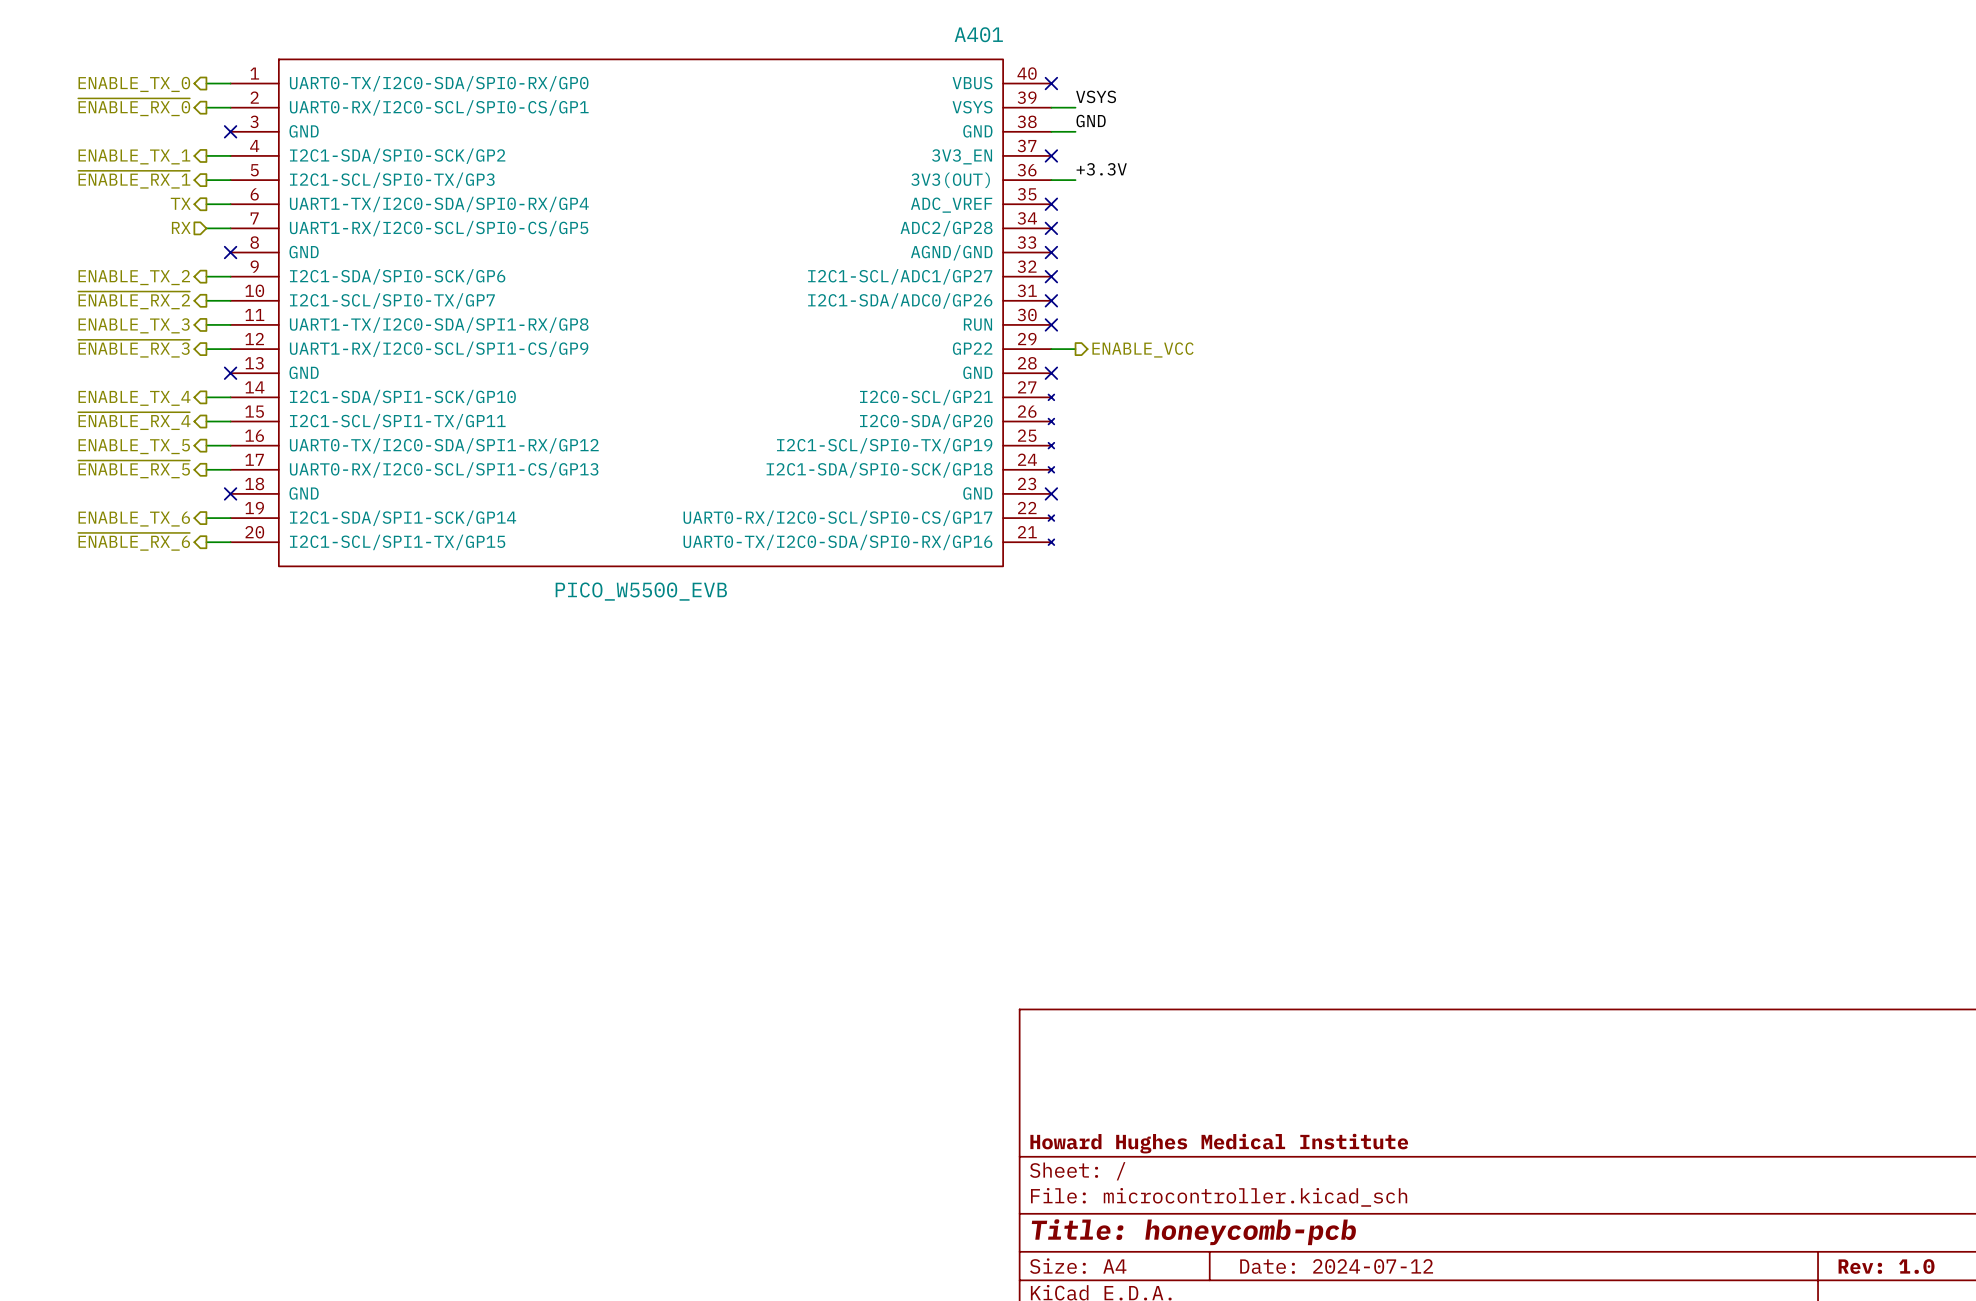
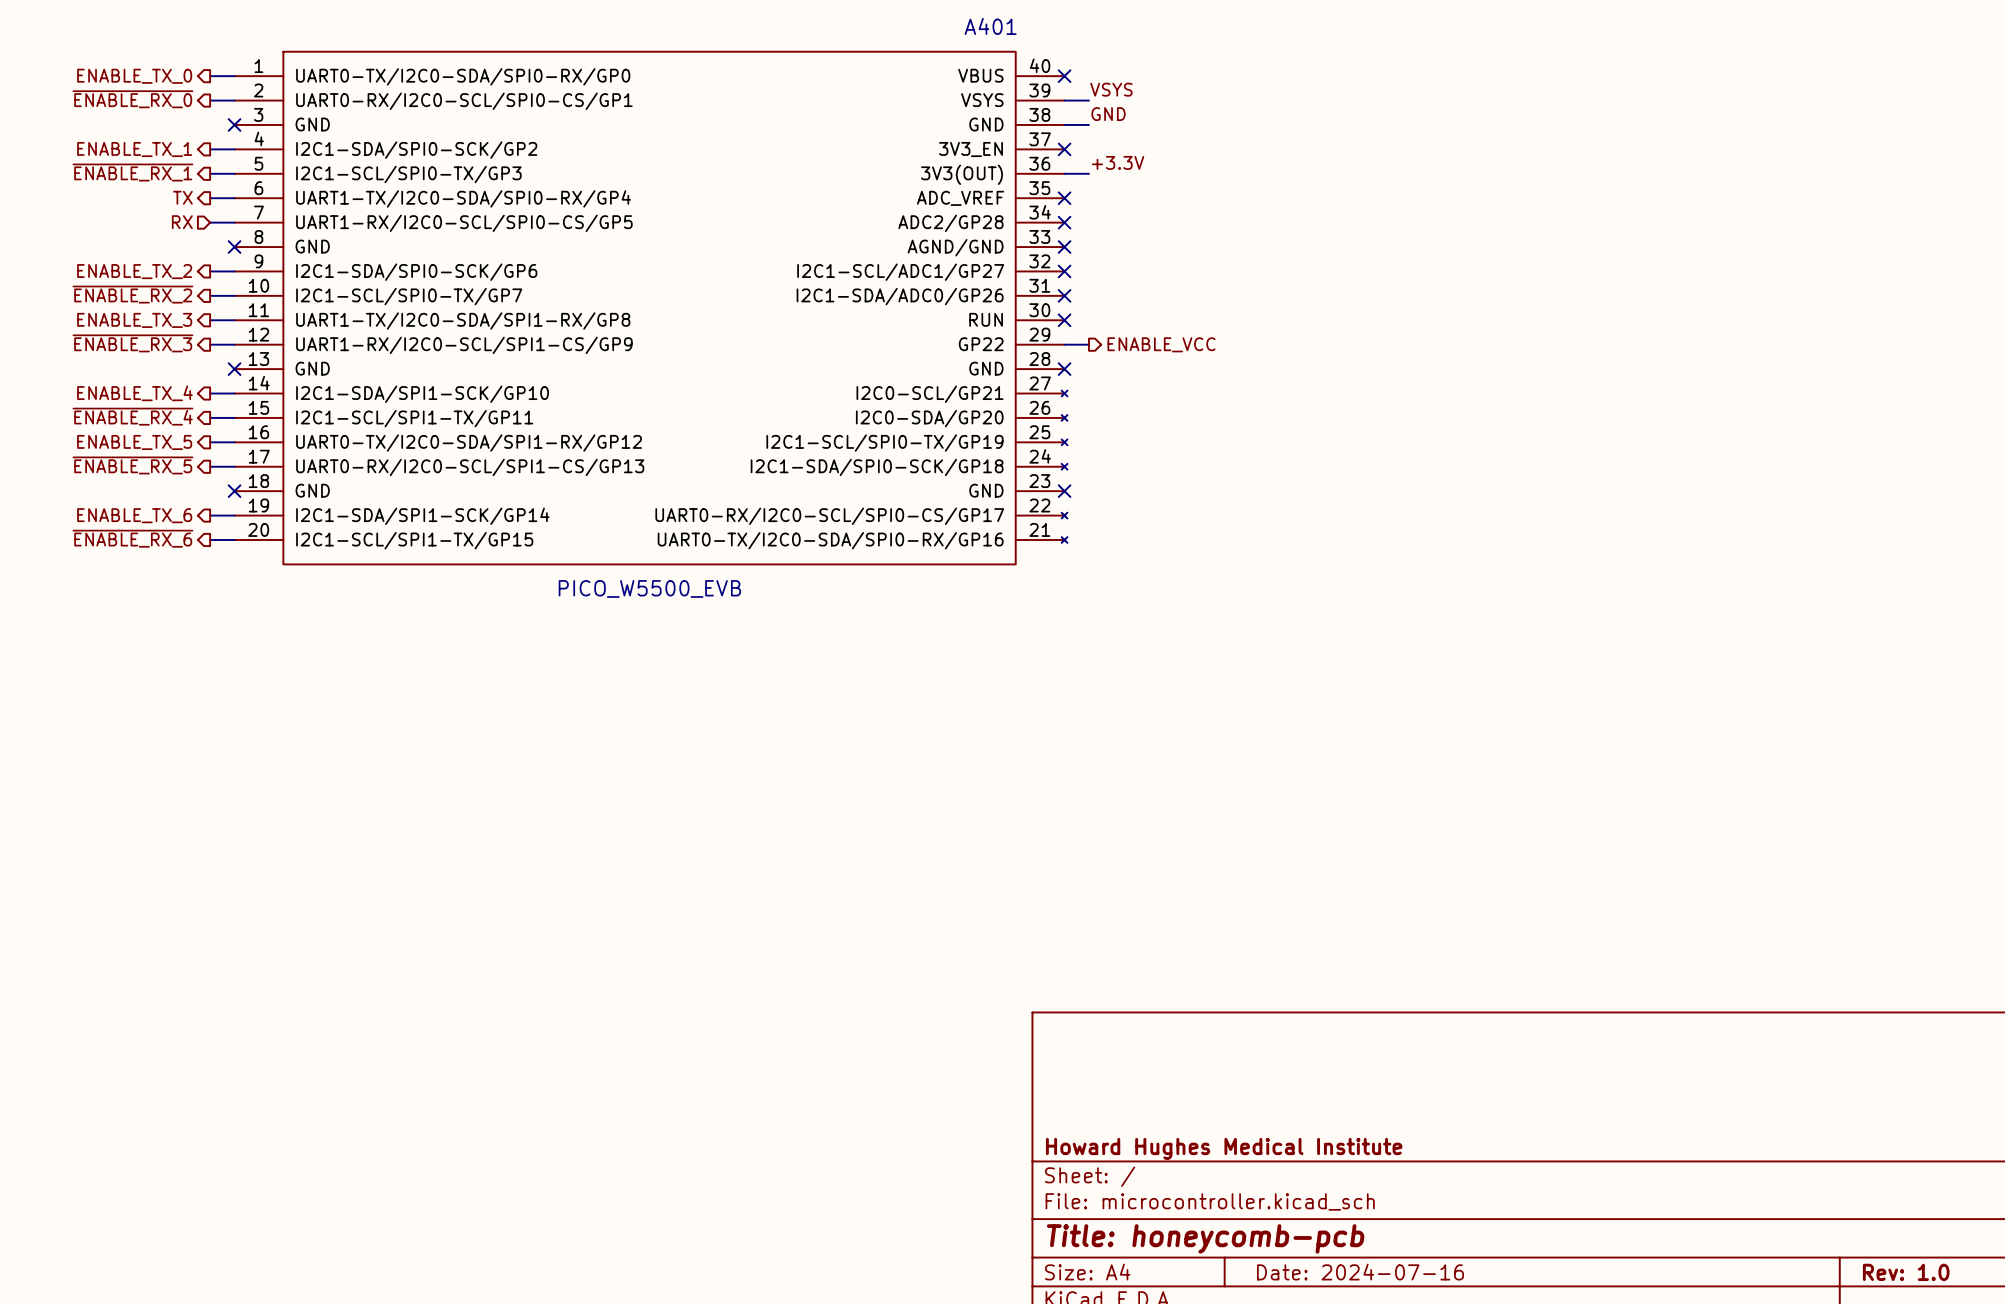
title block: Date: 2024-07-12 (1336, 1266) -> Date: 2024-07-16 (1360, 1272)

